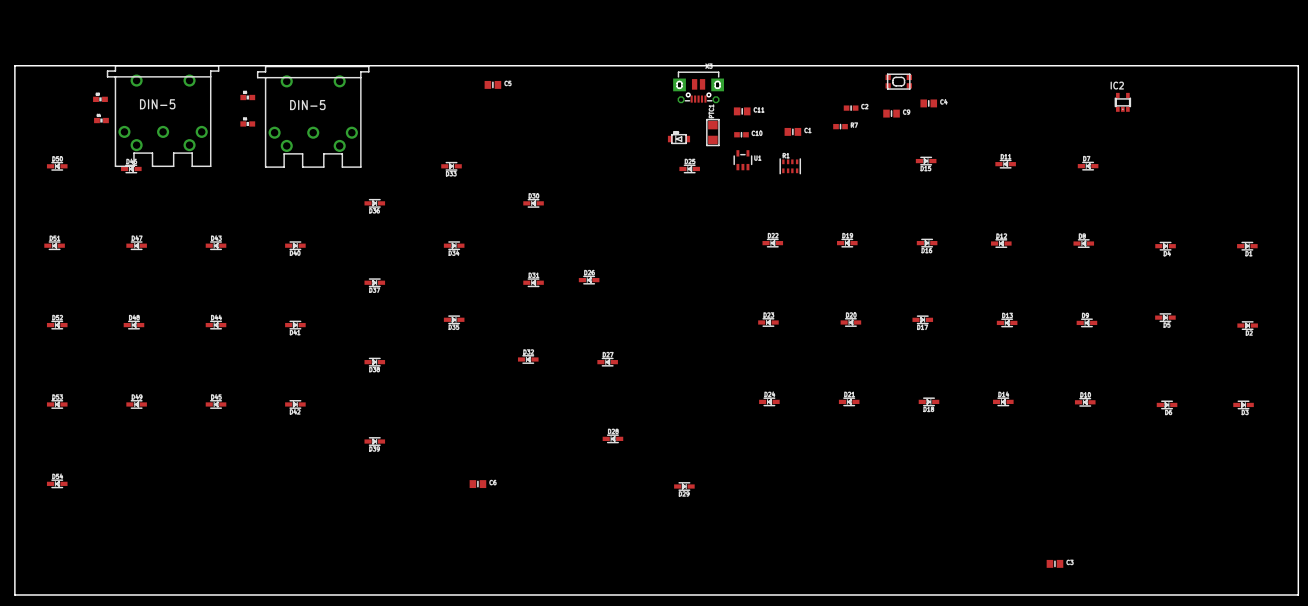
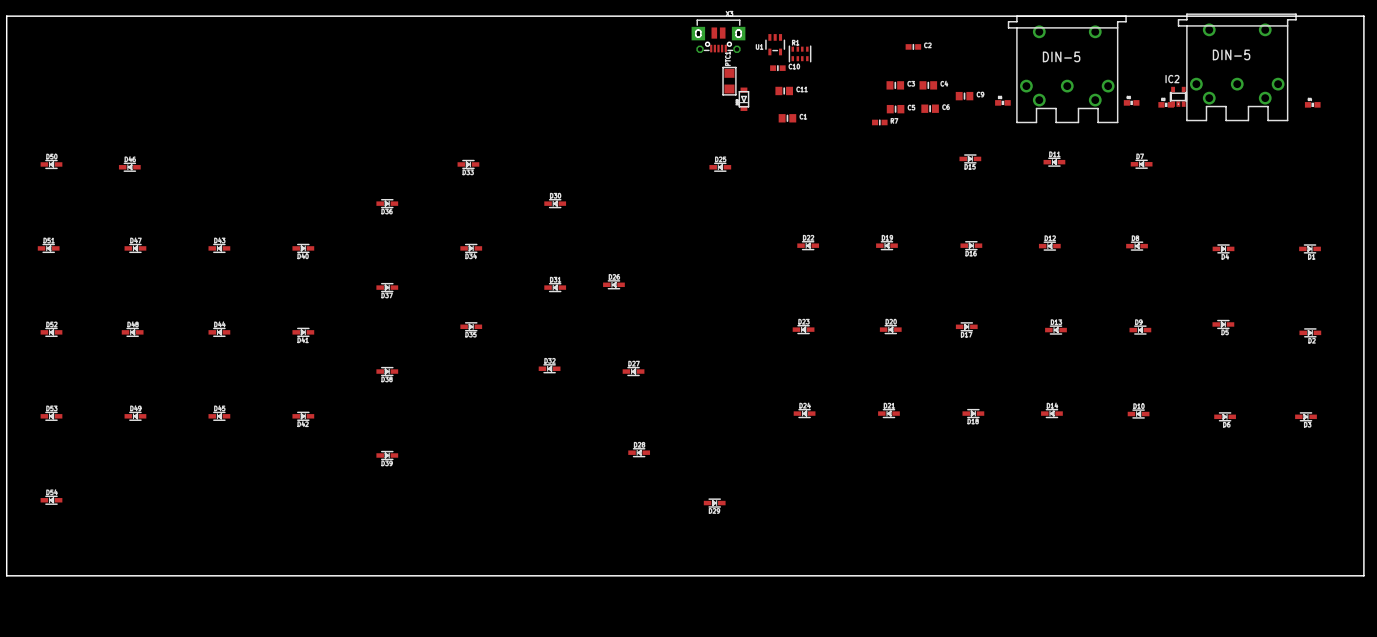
board edge: (14, 65) (1298, 65) -> (6, 58) (6, 16) (1363, 16) (1363, 58)
part: none -> (1237, 67)
part: none -> (1067, 69)
part: (898, 81) -> none
part position: (492, 84) -> (895, 109)
part position: (698, 87) -> (718, 36)
part position: (247, 97) -> (1002, 102)
part position: (100, 99) -> (1166, 104)
part position: (928, 103) -> (928, 85)
part position: (851, 108) -> (913, 46)
part position: (742, 111) -> (784, 90)
part position: (891, 113) -> (964, 96)
part: (163, 116) -> none
part: (313, 116) -> none
part position: (101, 120) -> (1312, 104)
part position: (247, 123) -> (1131, 102)
part position: (792, 131) -> (787, 118)
part position: (712, 132) -> (729, 81)
part position: (741, 134) -> (777, 68)
part rotation: 0° (678, 139) -> 90° counterclockwise (743, 99)
part position: (678, 139) -> (743, 99)
part rotation: 0° (742, 160) -> 180° (775, 44)
part position: (742, 160) -> (775, 44)
part position: (790, 166) -> (800, 53)
part position: (477, 484) -> (930, 108)
board edge: (14, 555) (14, 595) (1298, 595) (1298, 555) -> (6, 575) (1363, 575)
part position: (1054, 563) -> (895, 85)

